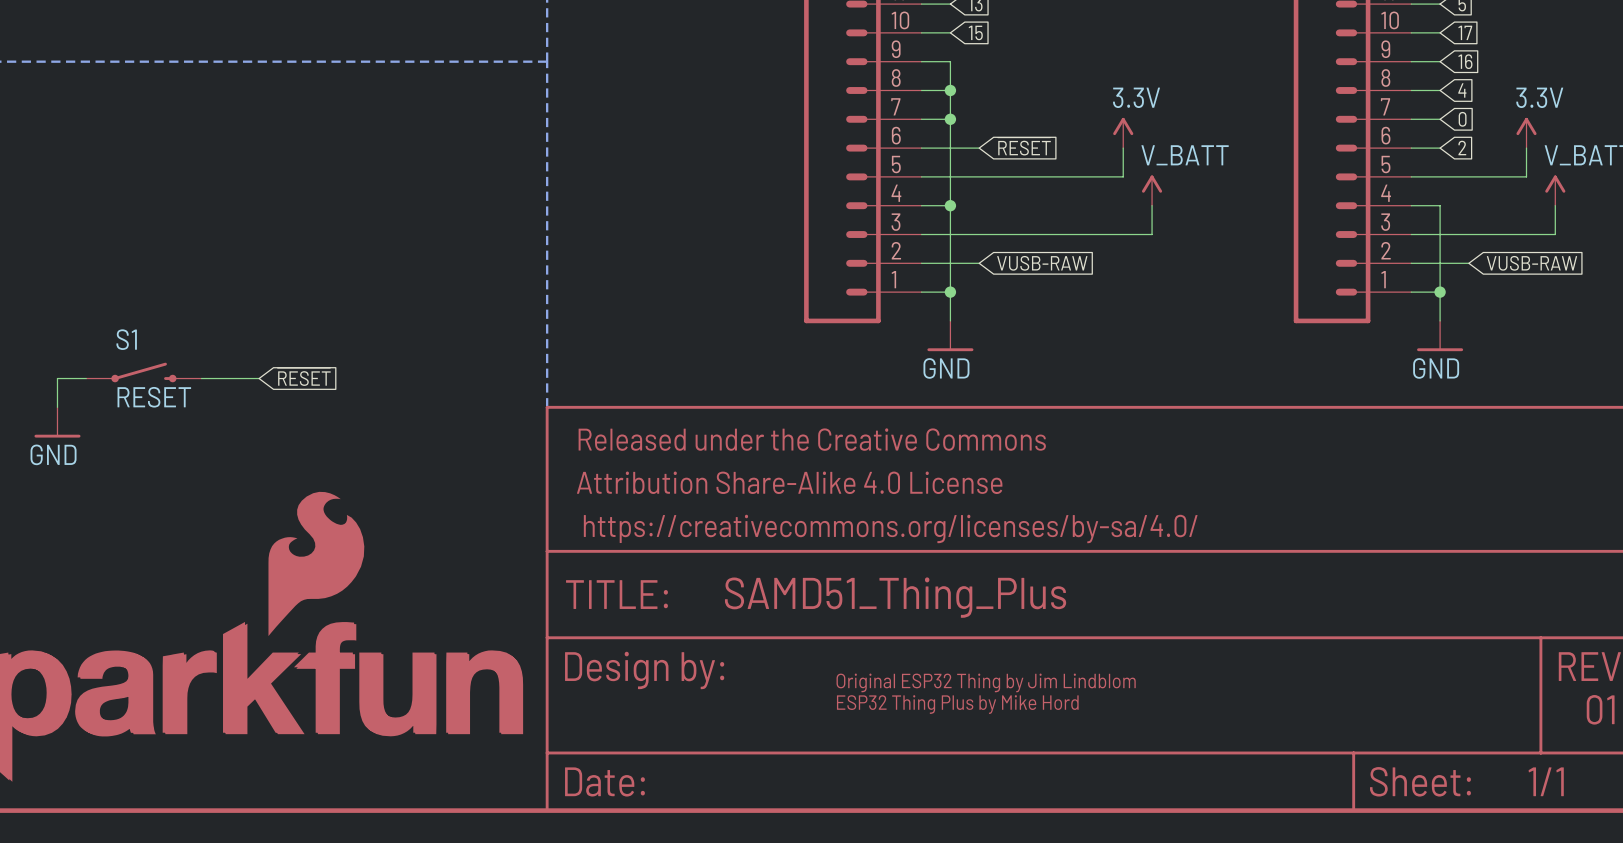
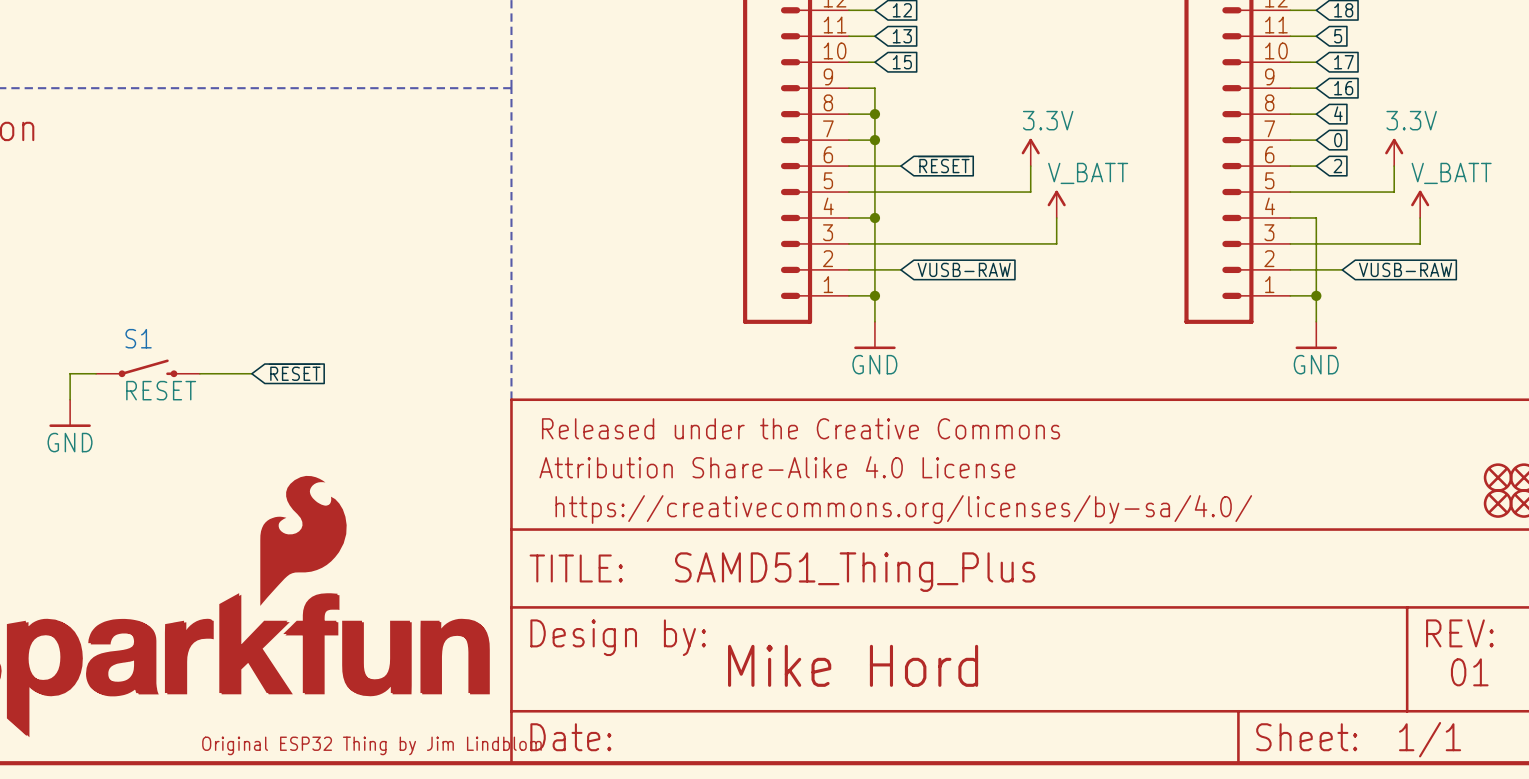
text: Original ESP32 Thing by Jim Lindblom (986, 682) -> none
text: none -> Mike Hord (853, 665)
text: ESP32 Thing Plus by Mike Hord (957, 704) -> none
text: none -> Original ESP32 Thing by Jim Lindblom (371, 745)

